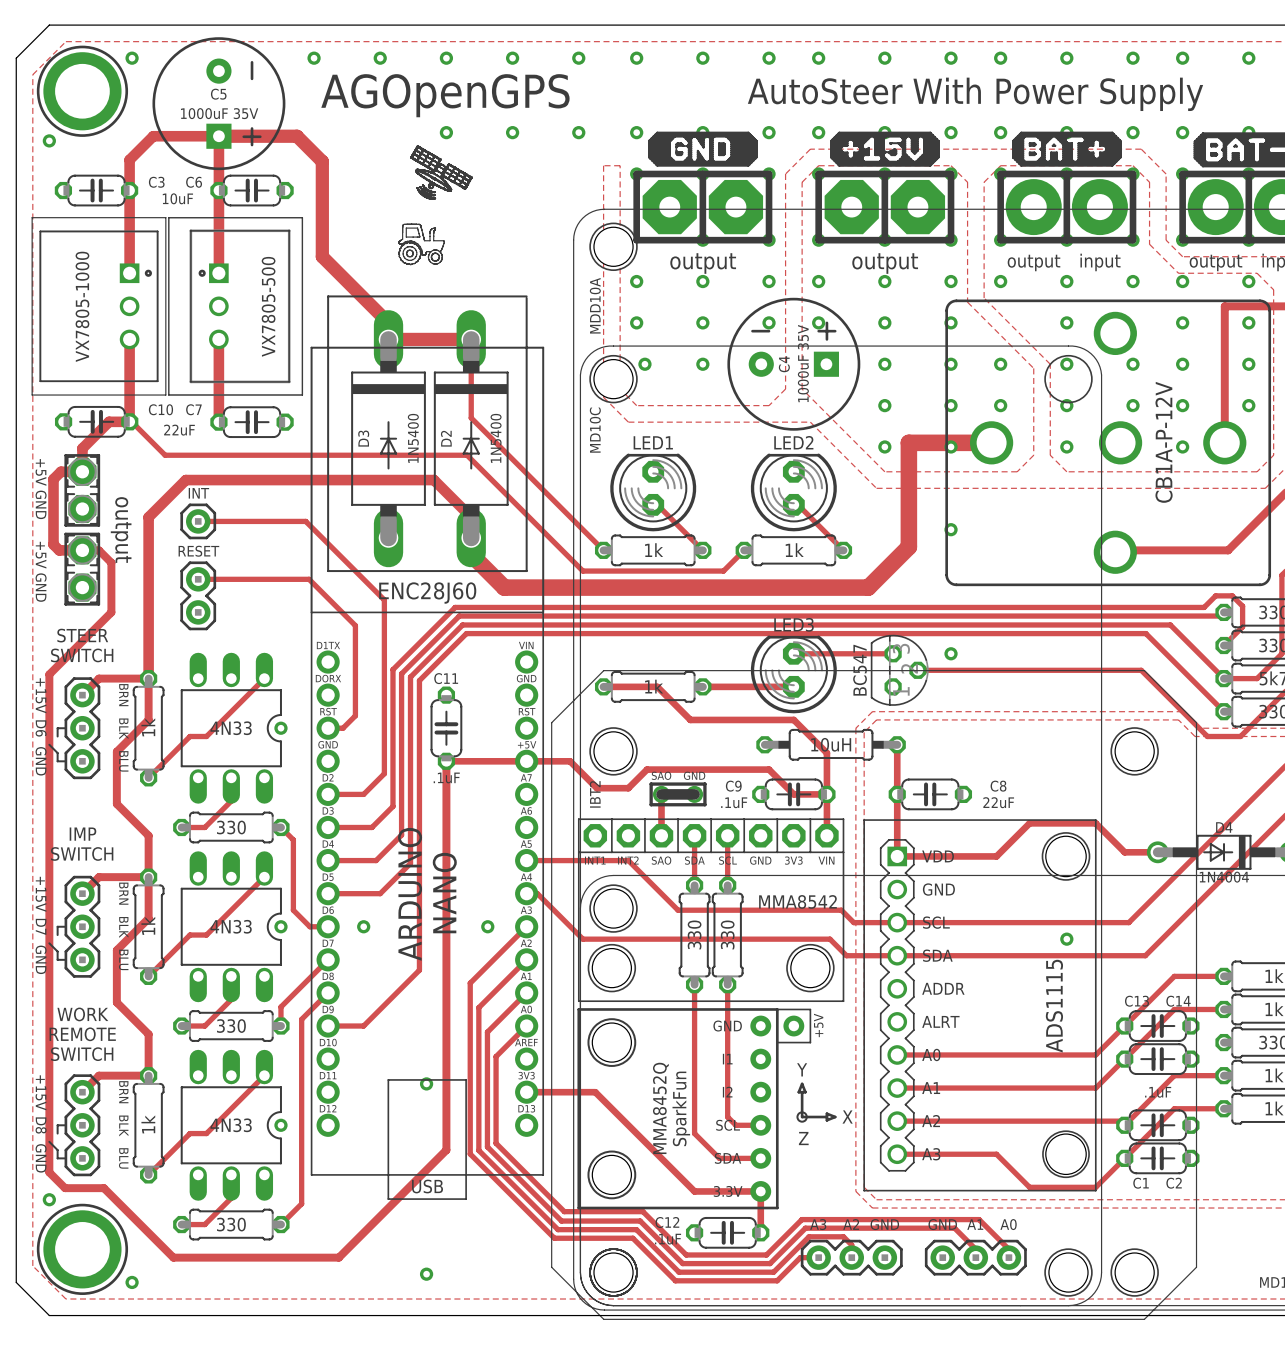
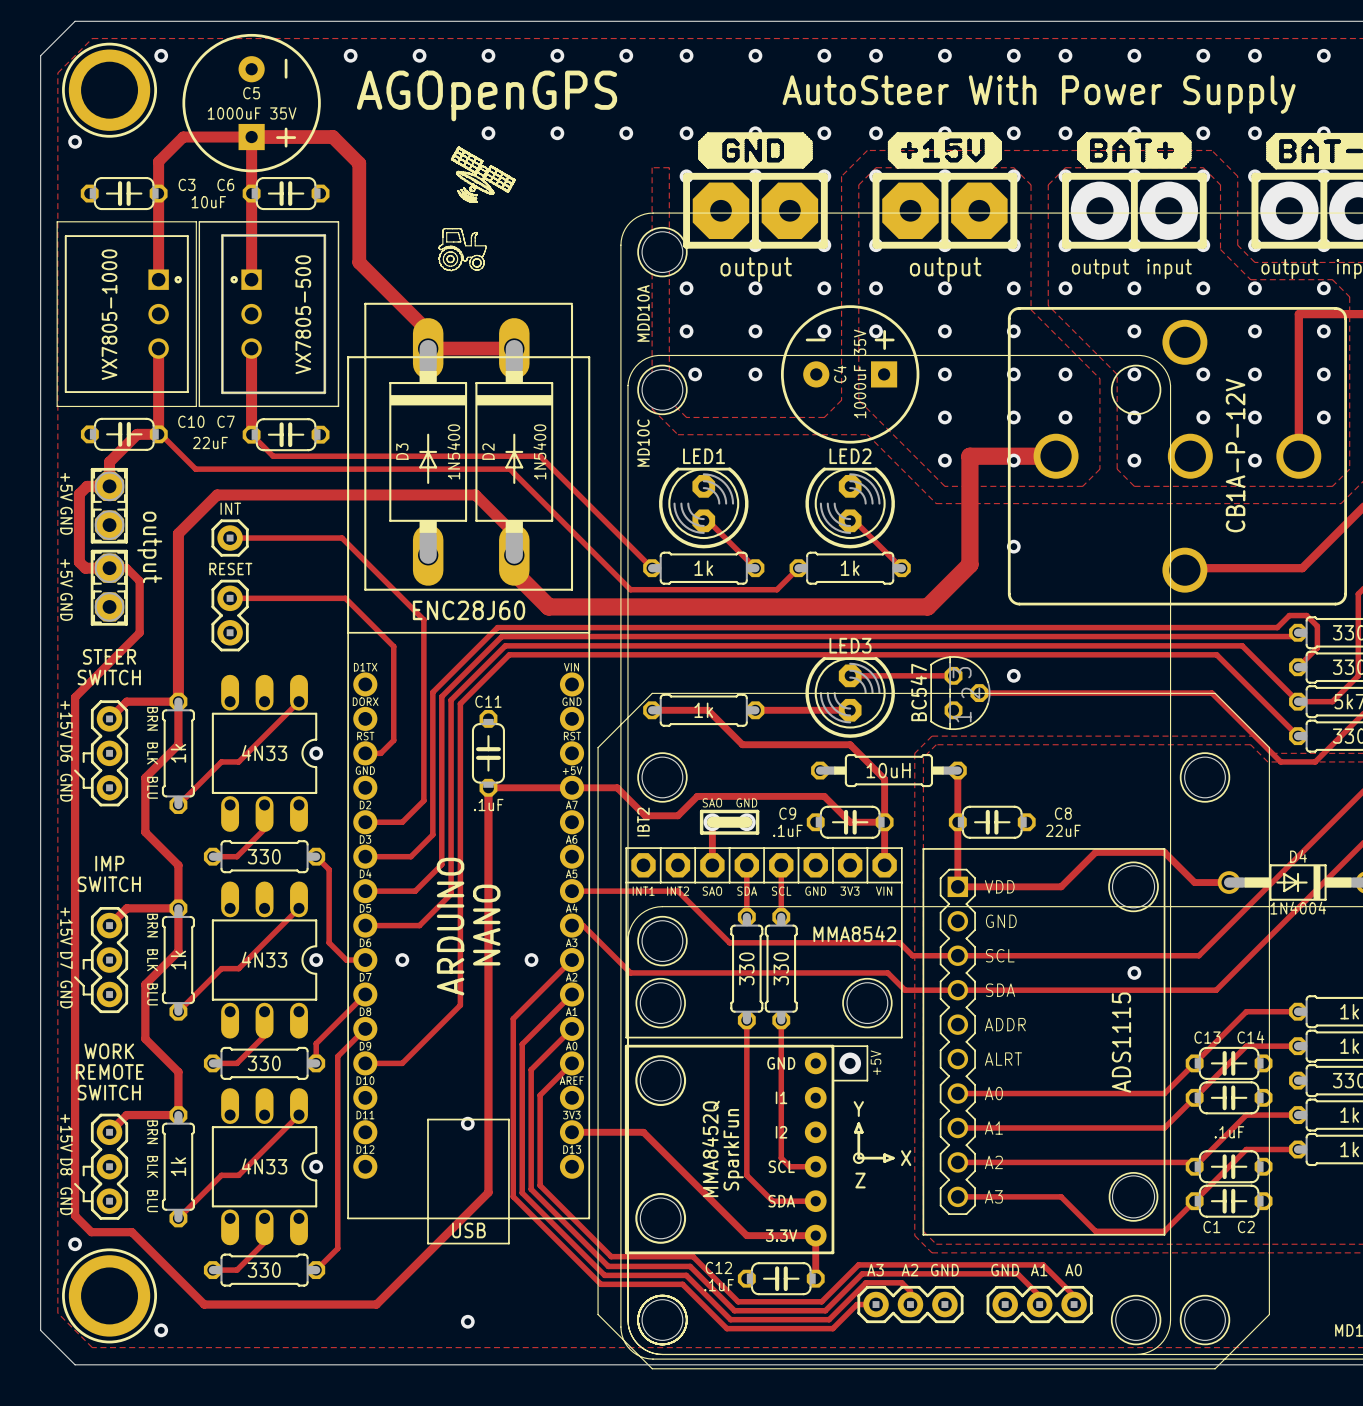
track: (471, 339) (471, 418) (496, 442) -> (251, 434) (273, 456) (540, 456)

